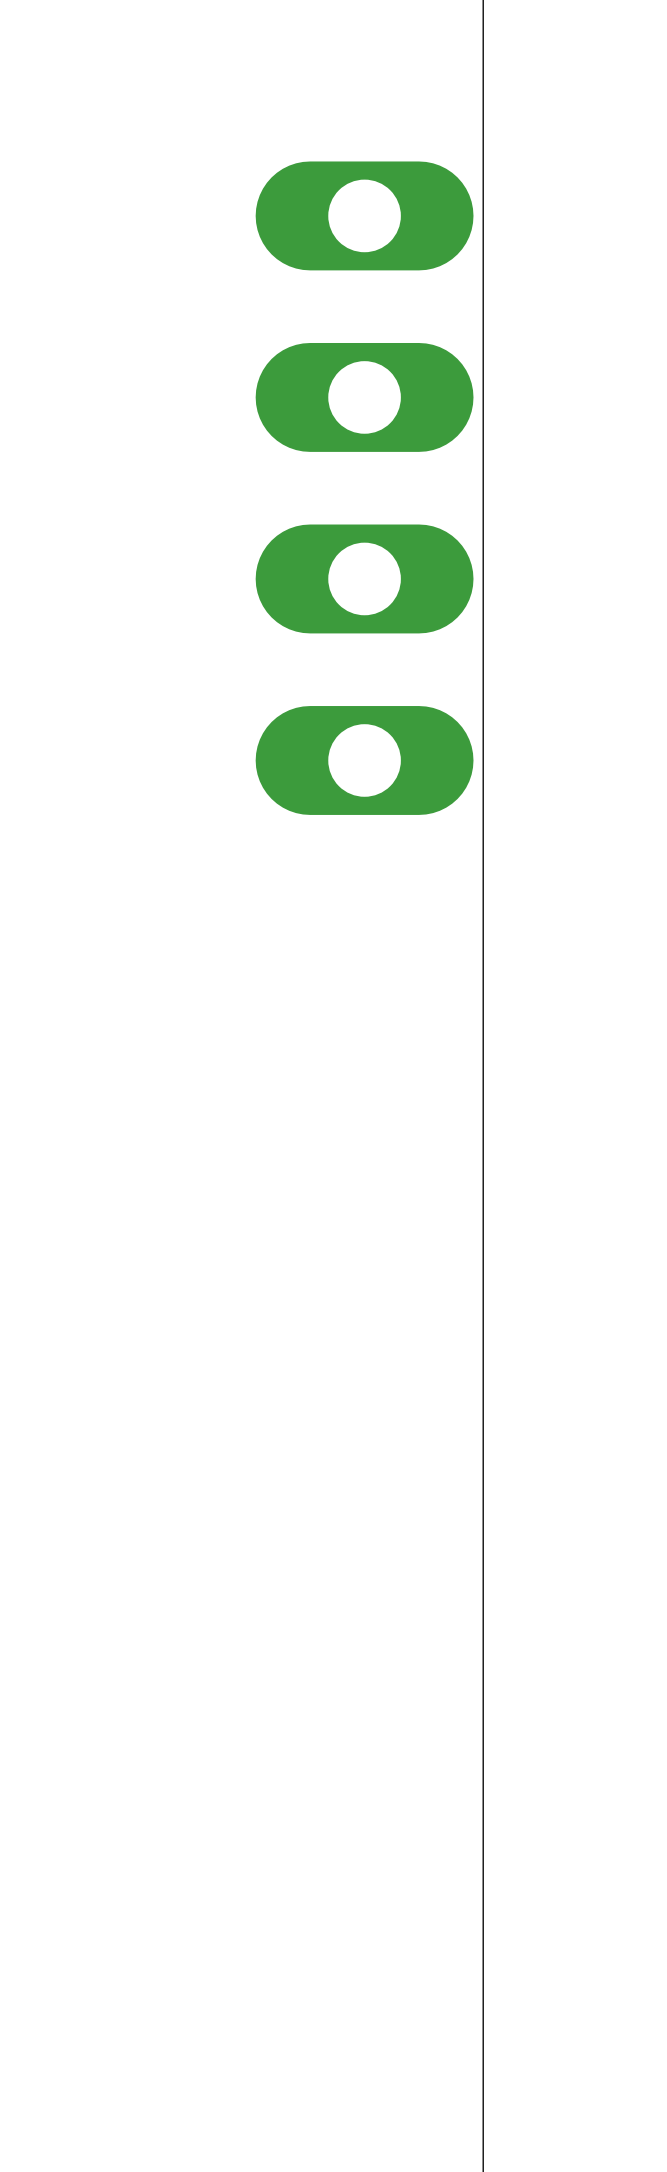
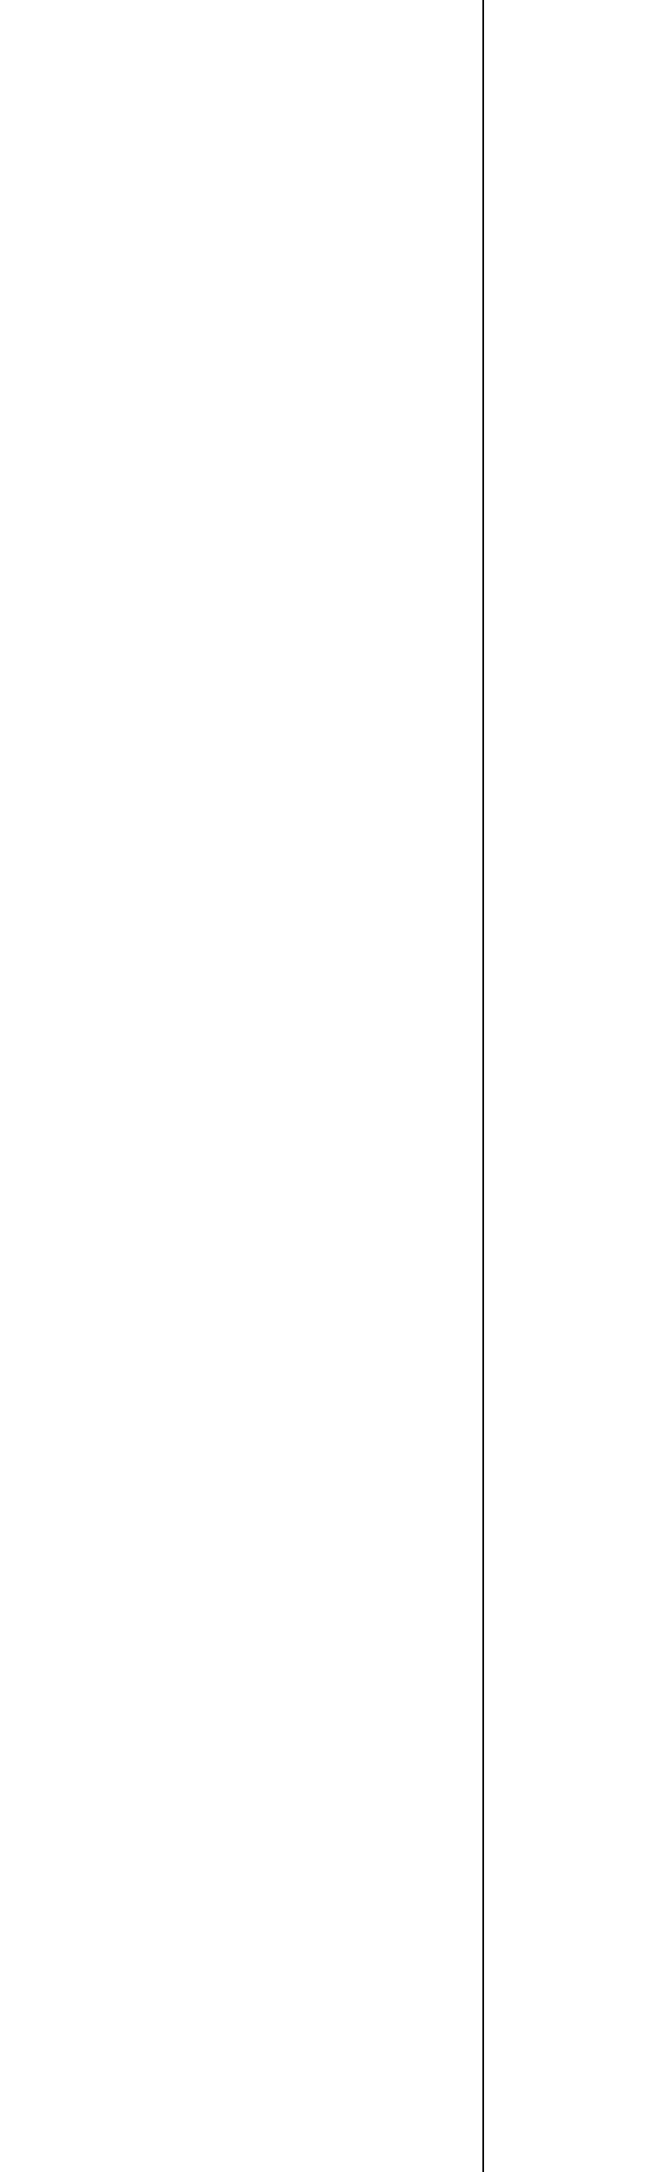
part: (364, 488) -> none

